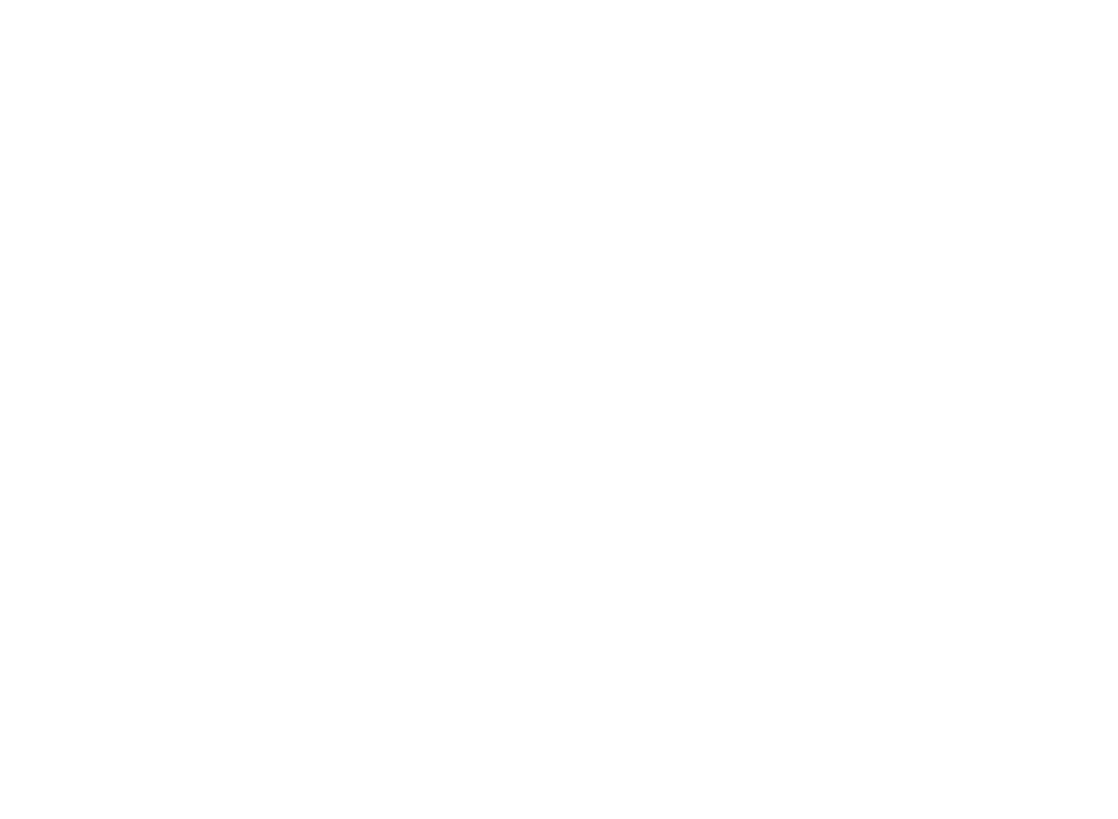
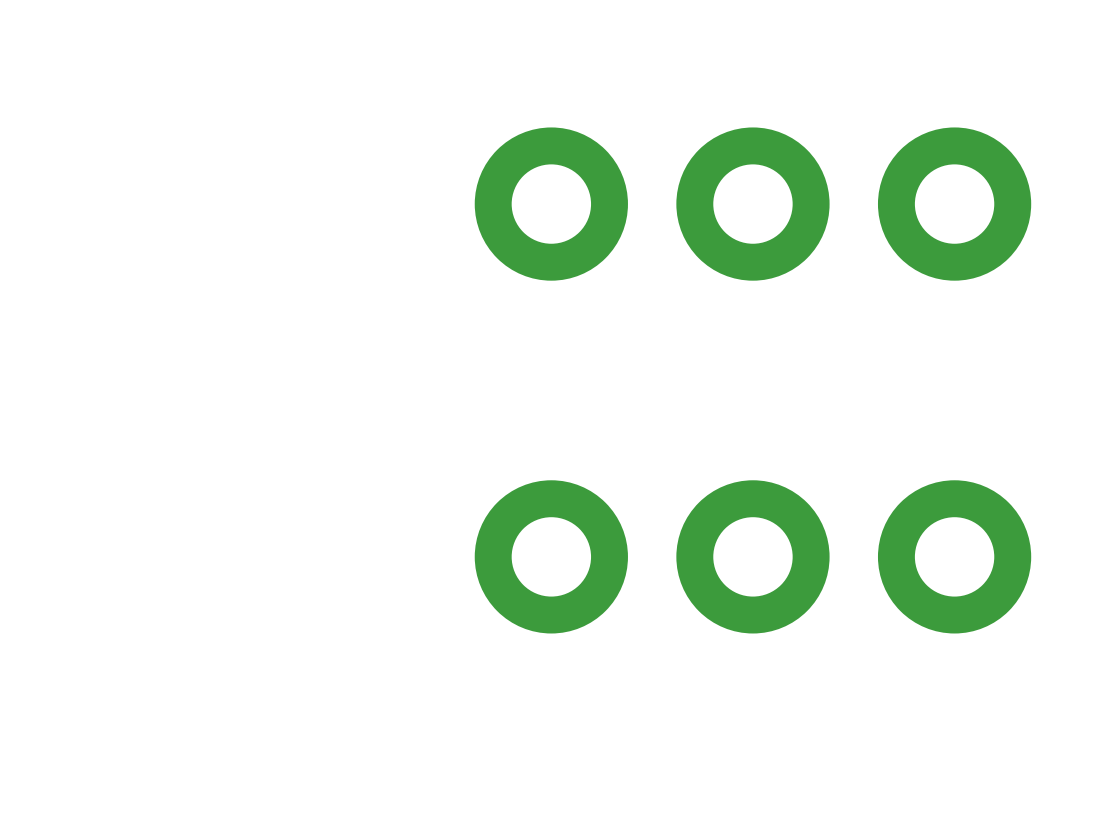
part: none -> (752, 204)
part: none -> (752, 556)

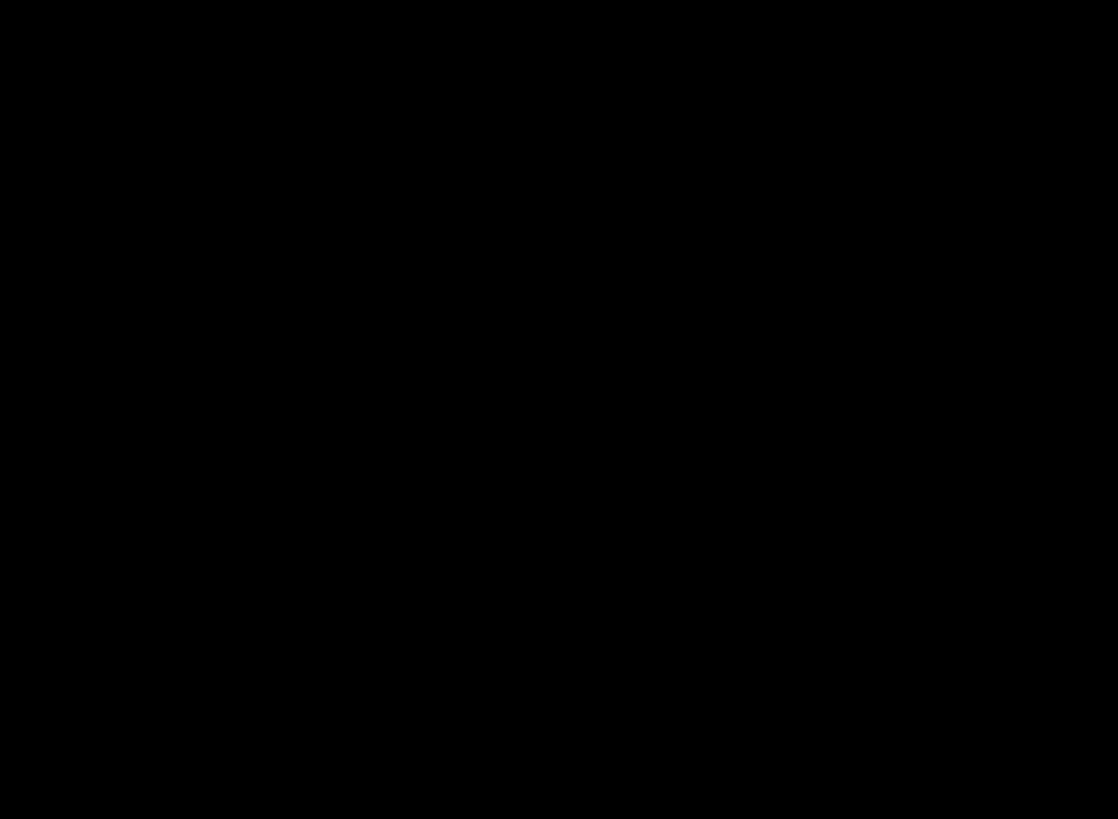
part: (752, 204) -> none
part: (752, 556) -> none

